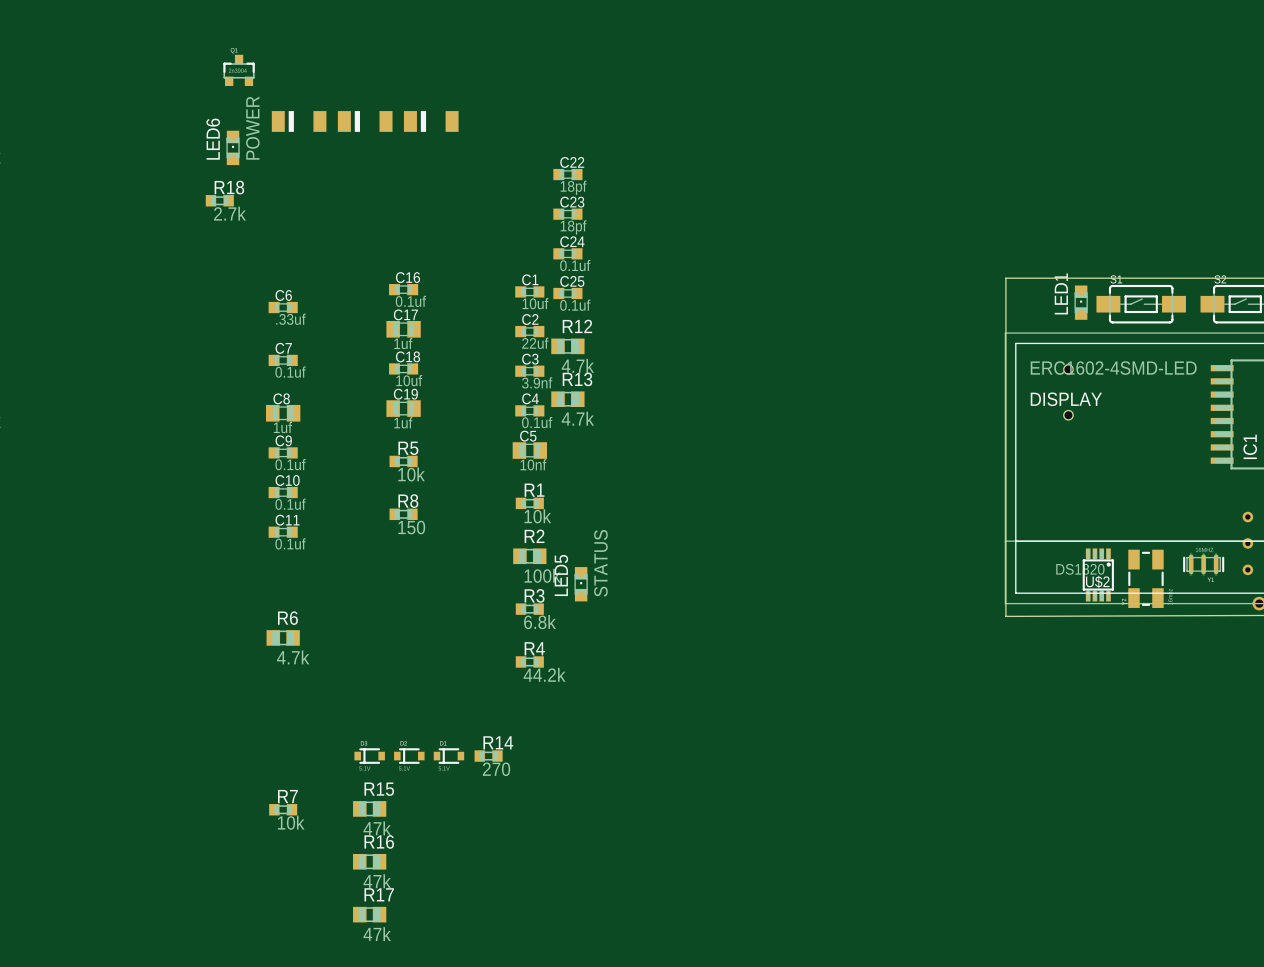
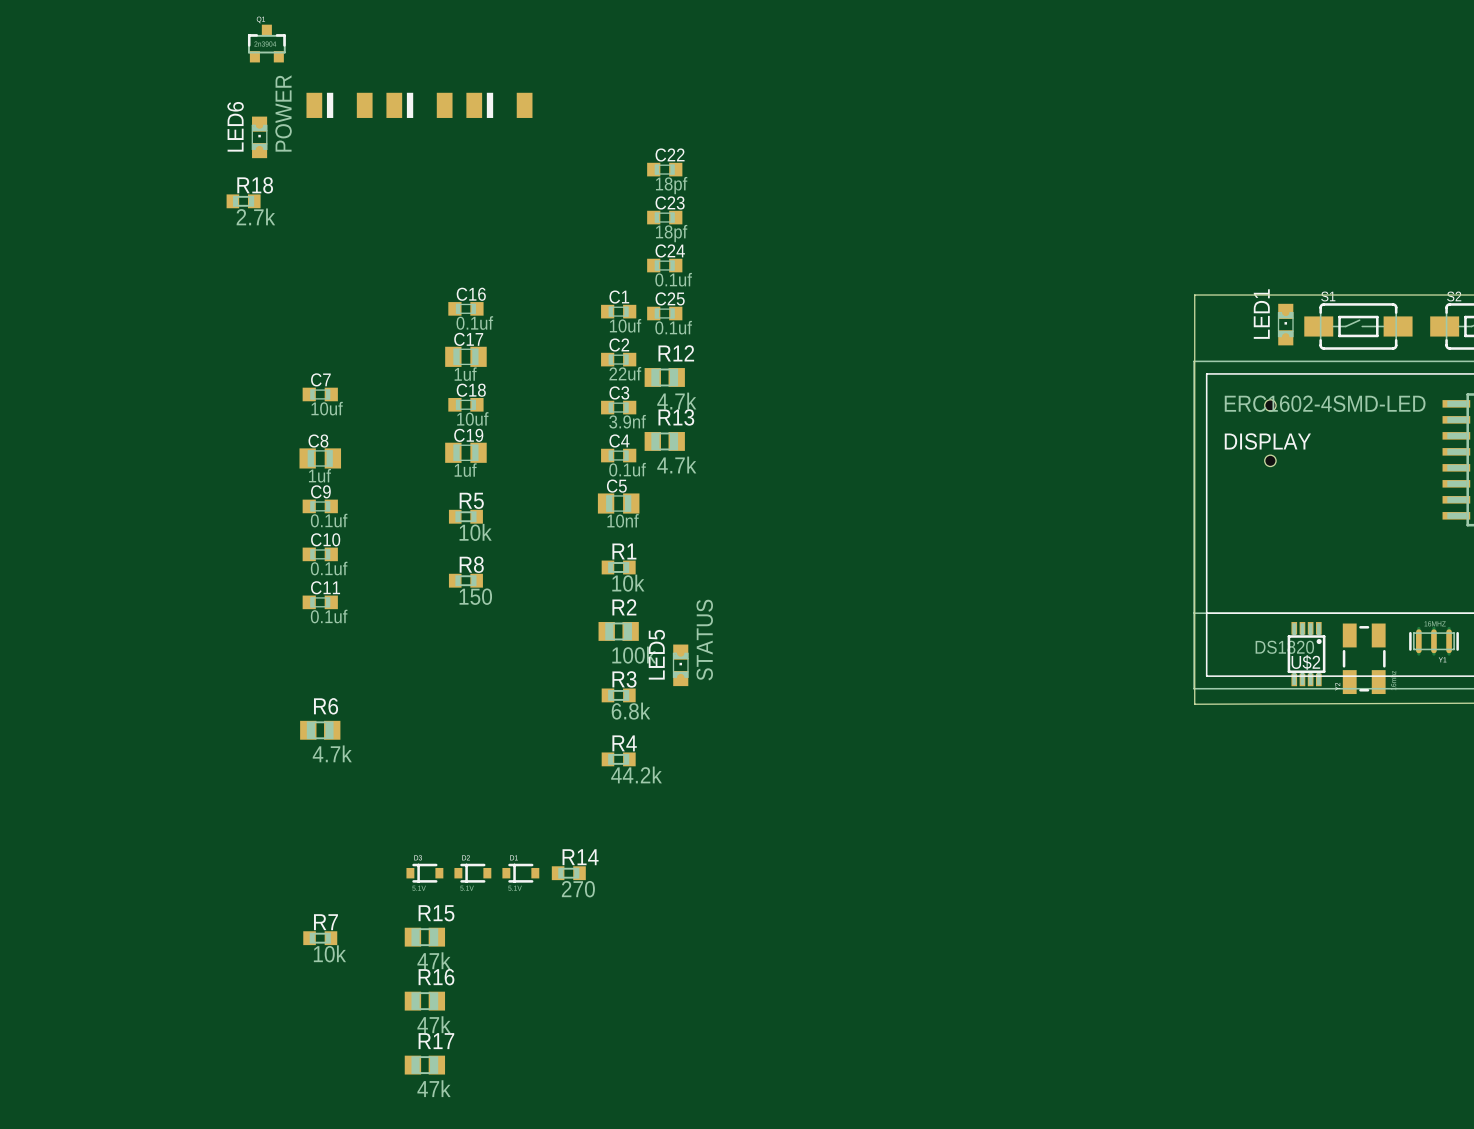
C6: .33uf (283, 307) -> none
C7 value: 0.1uf (290, 372) -> 10uf (327, 408)

